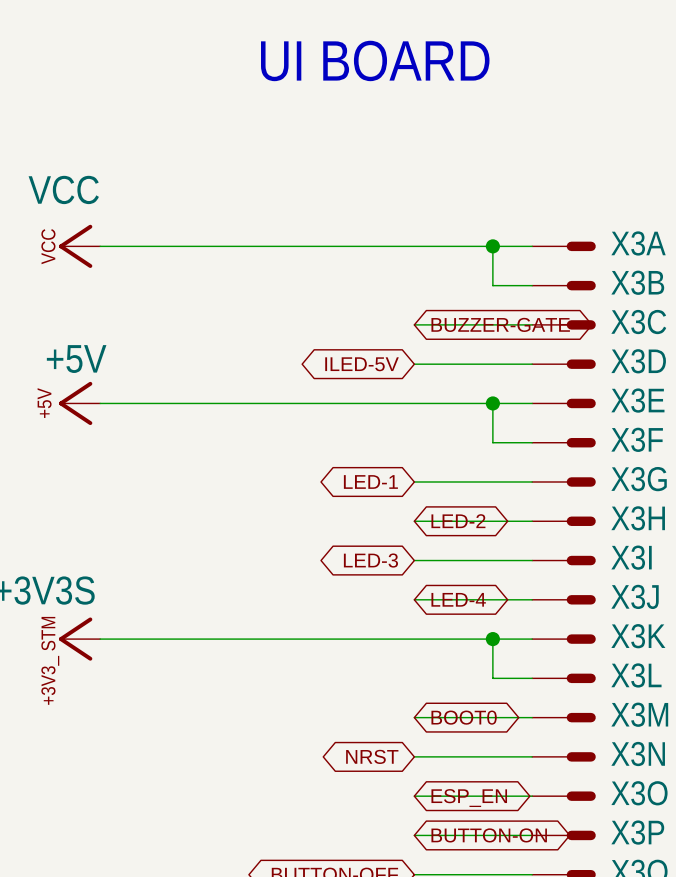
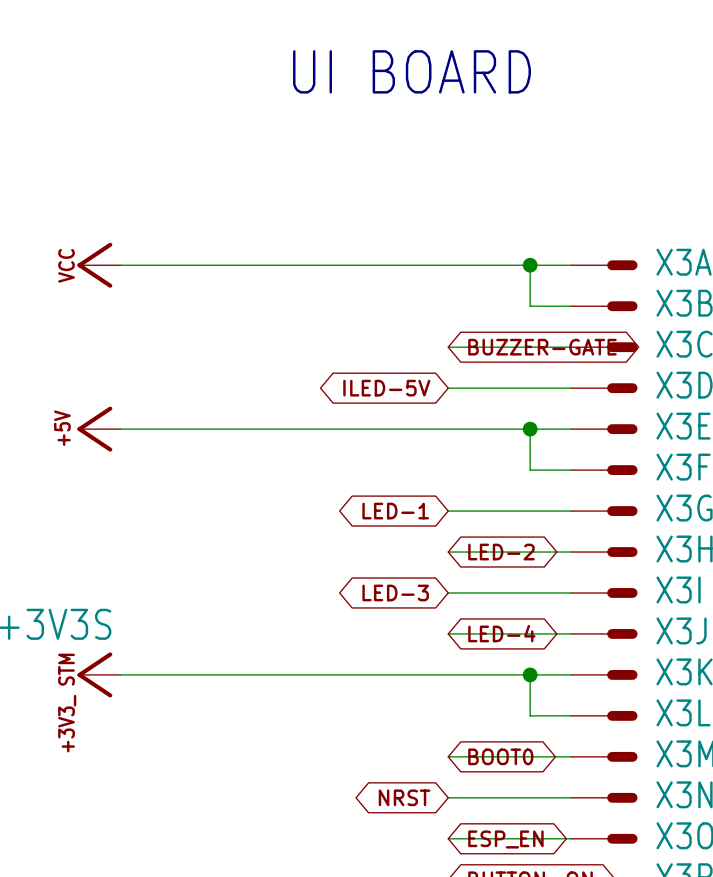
power symbol text: VCC (63, 189) -> none
power symbol text: +5V (76, 359) -> none

